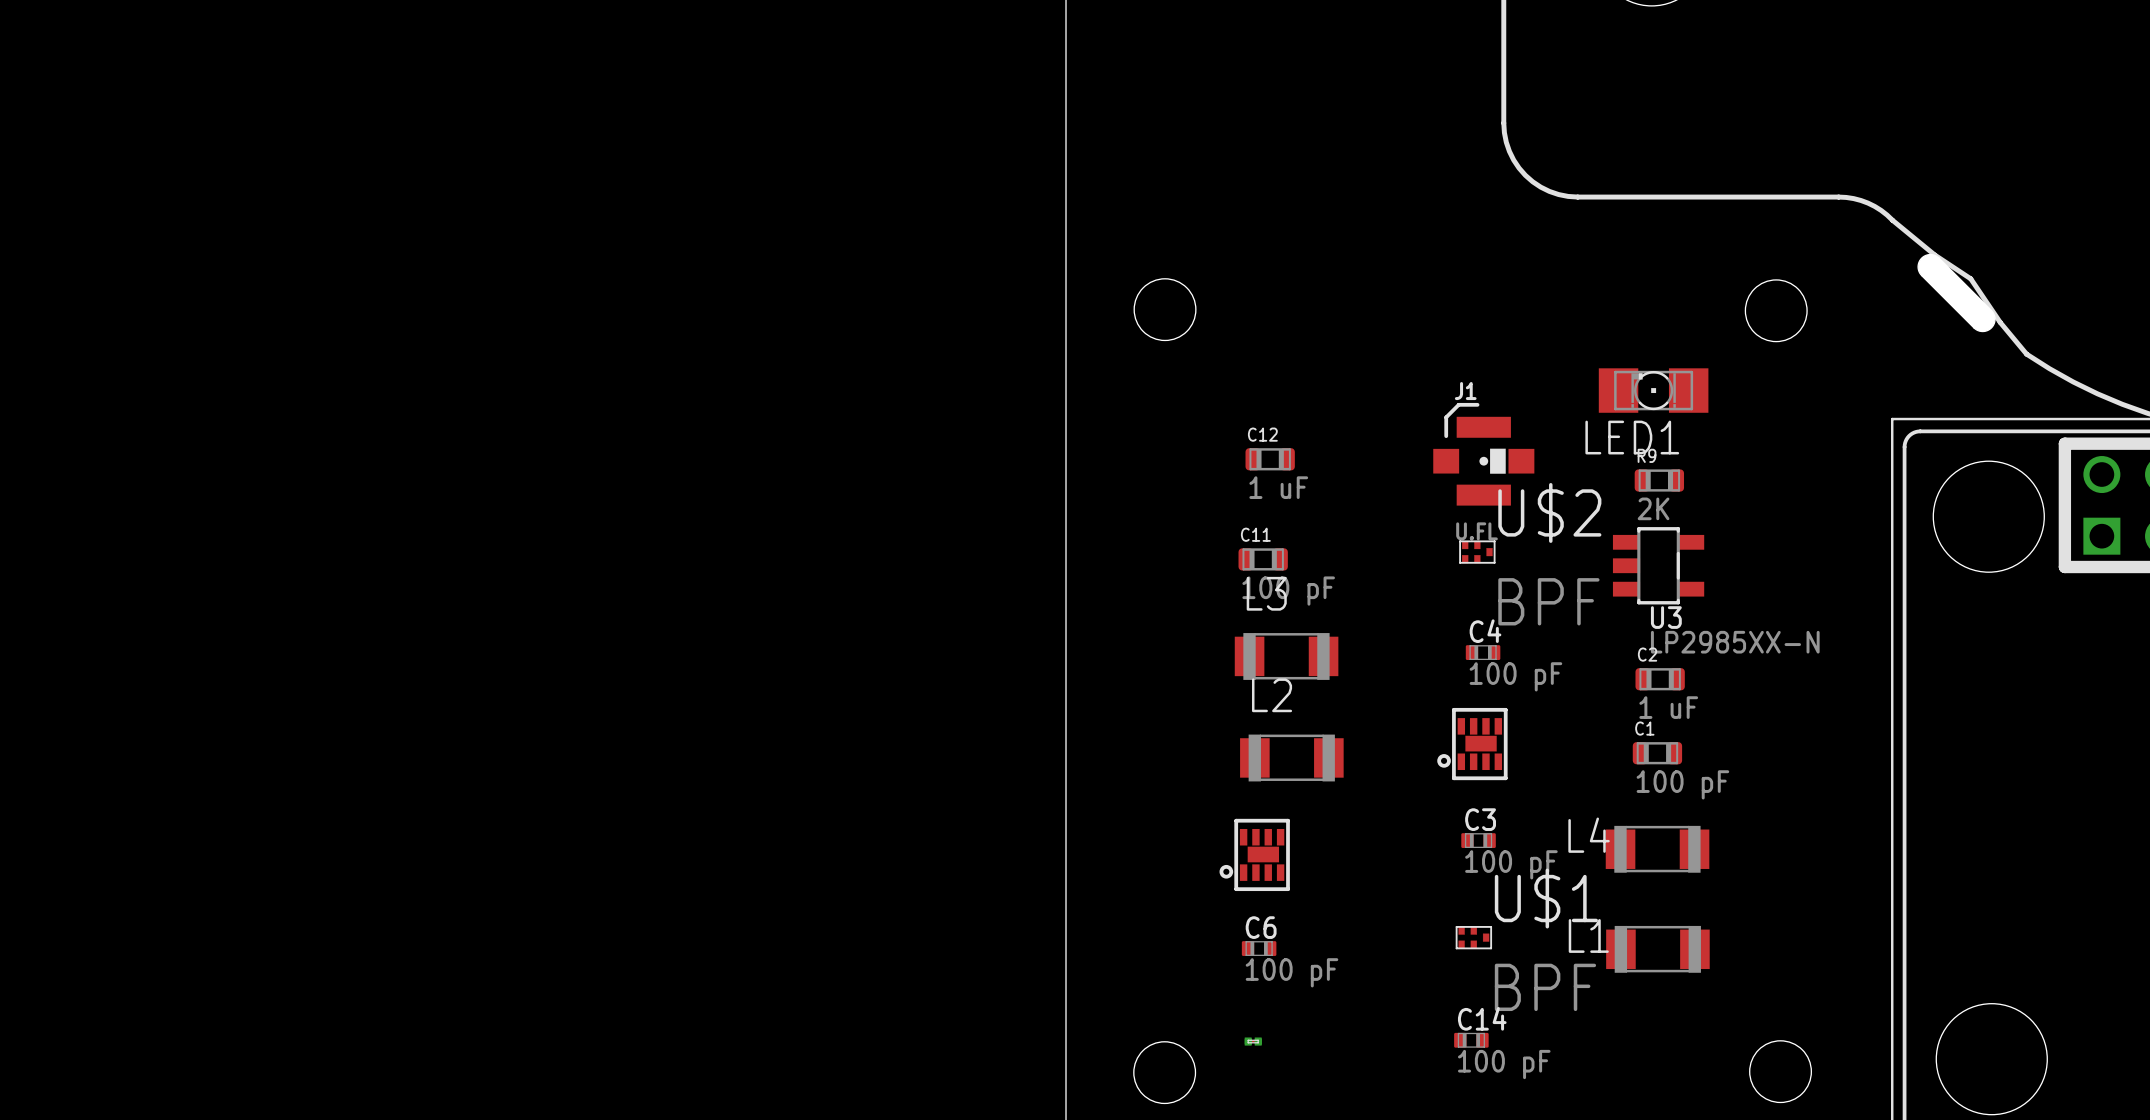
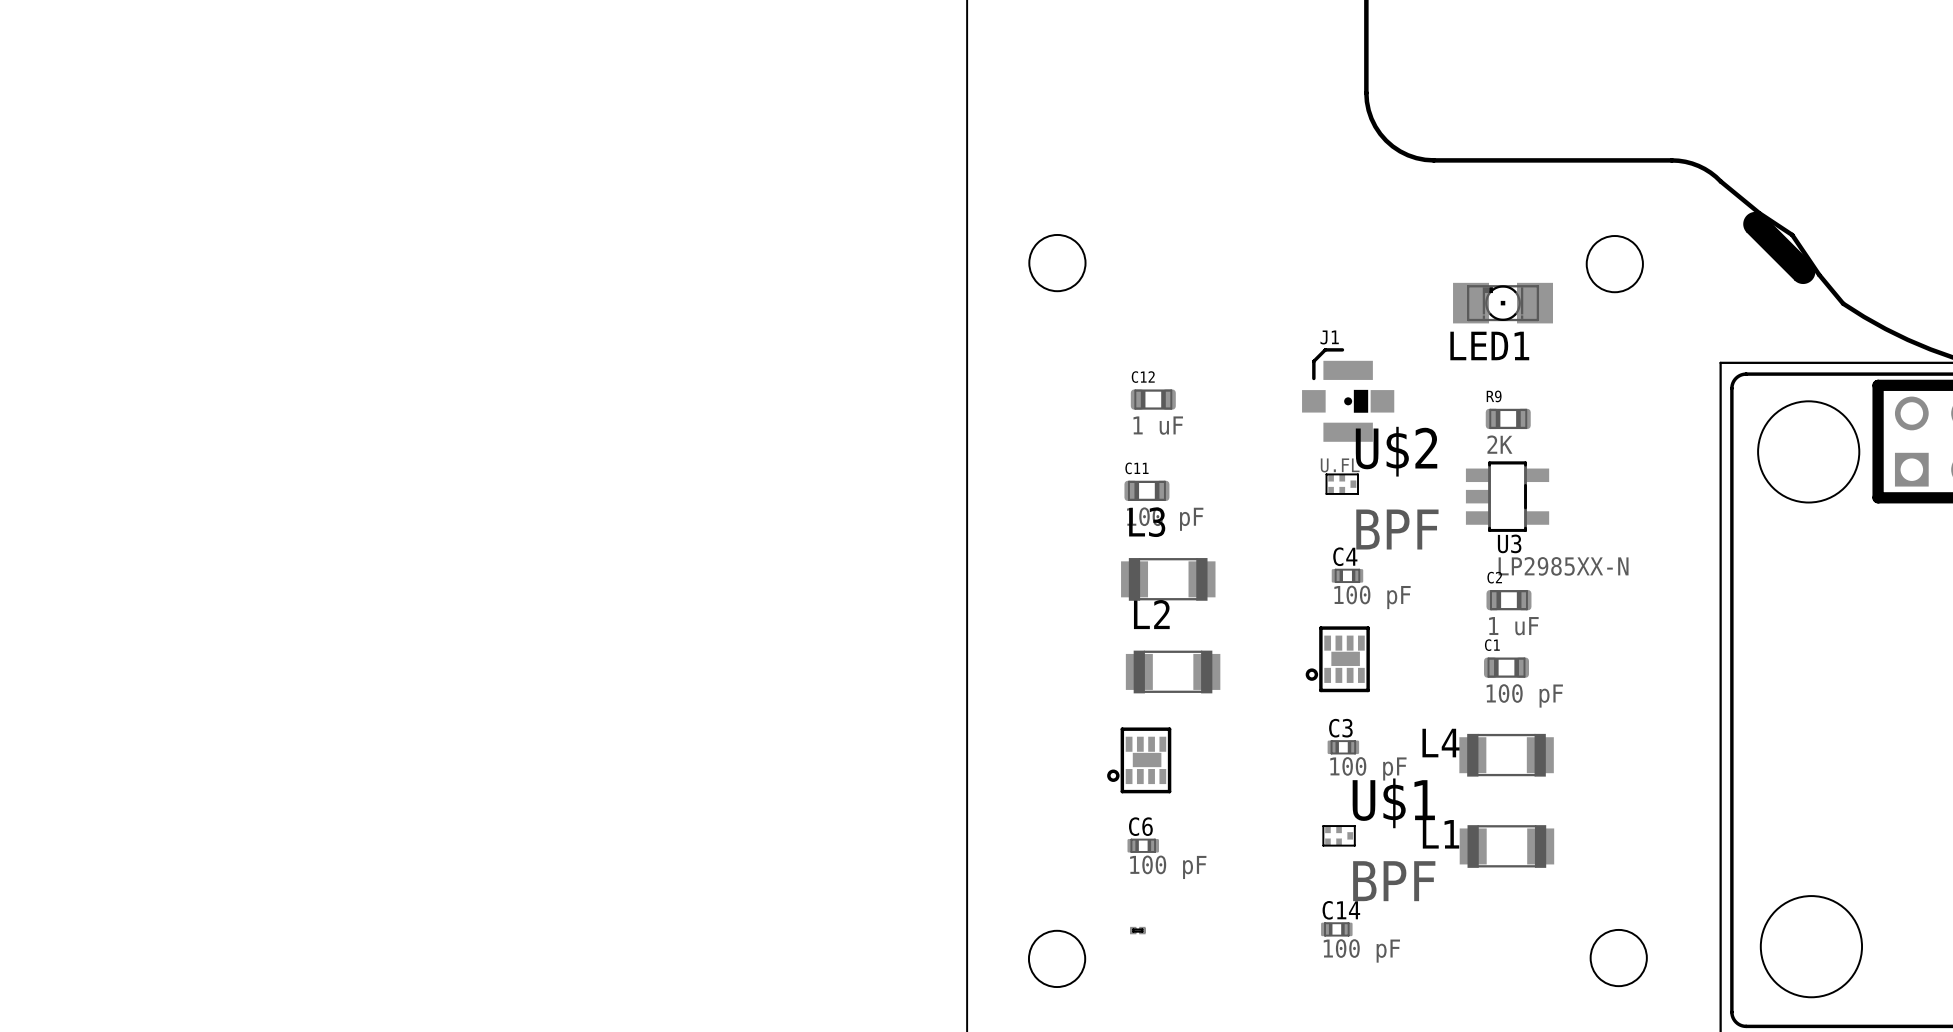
LED1 position: (1653, 390) -> (1503, 303)

